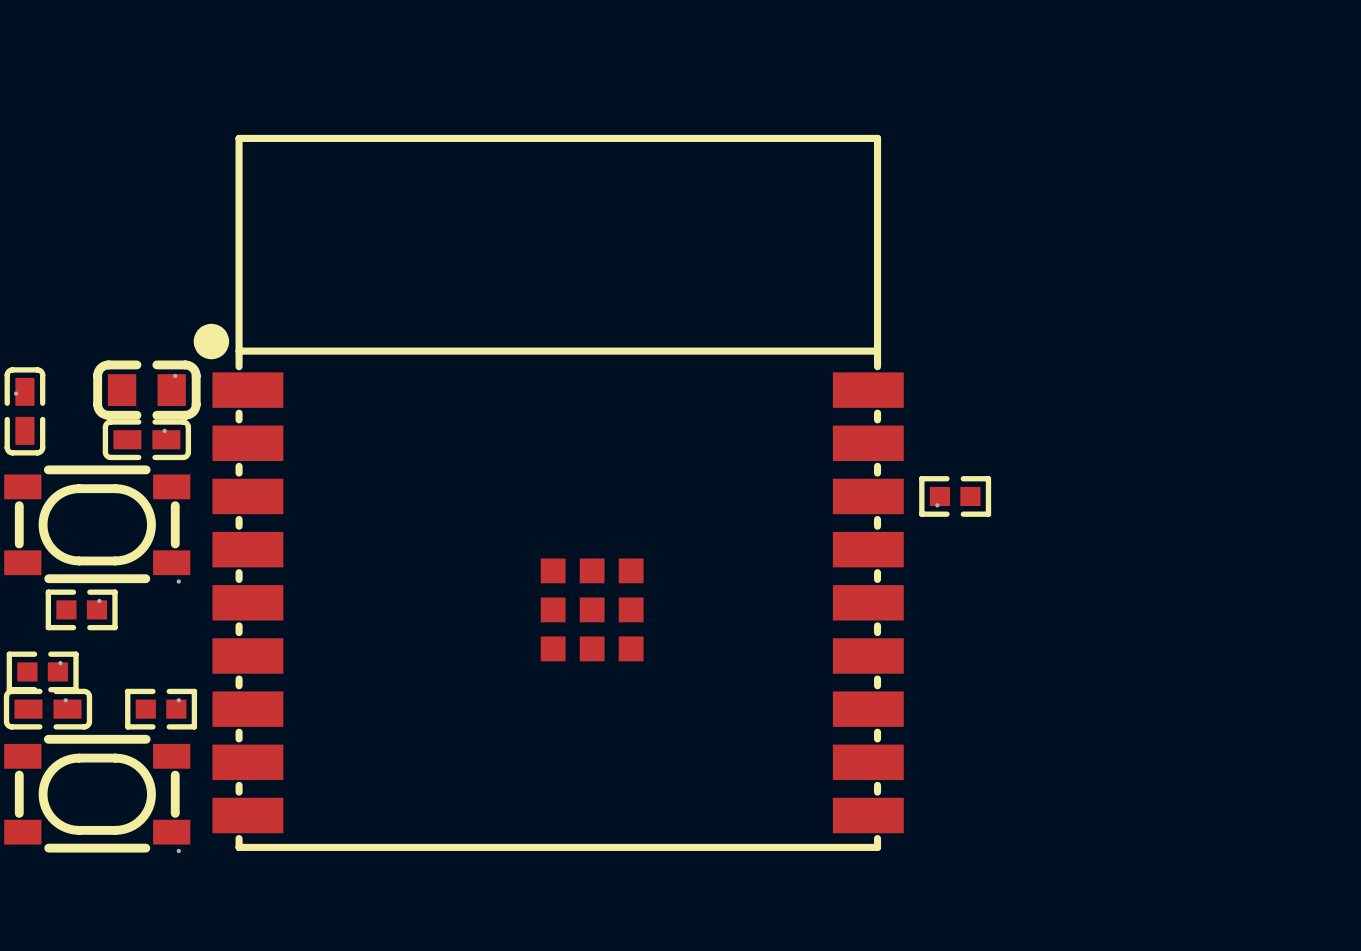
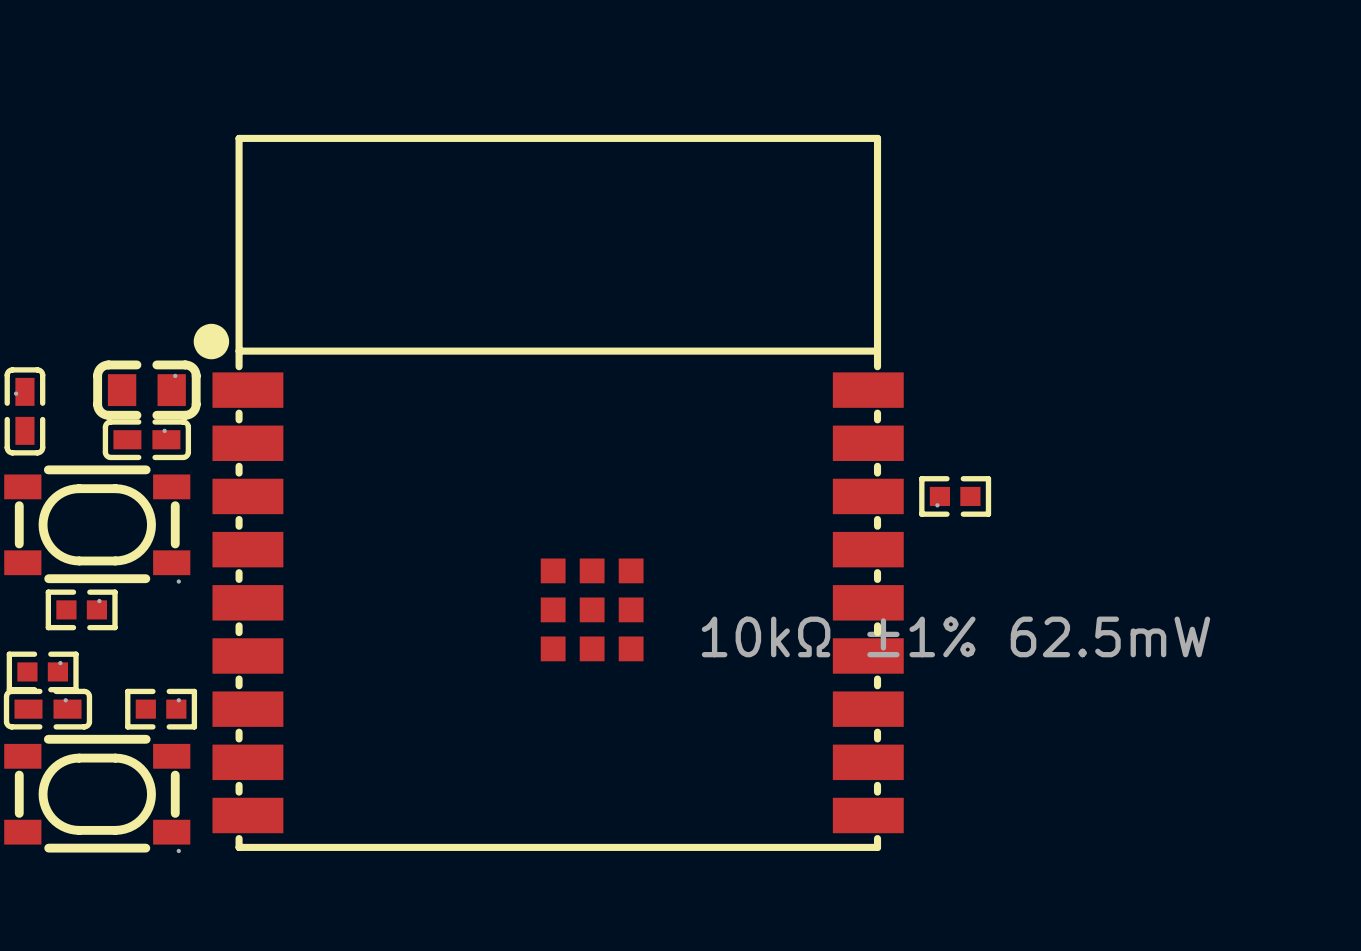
part value: none -> 10kΩ ±1% 62.5mW (956, 636)

